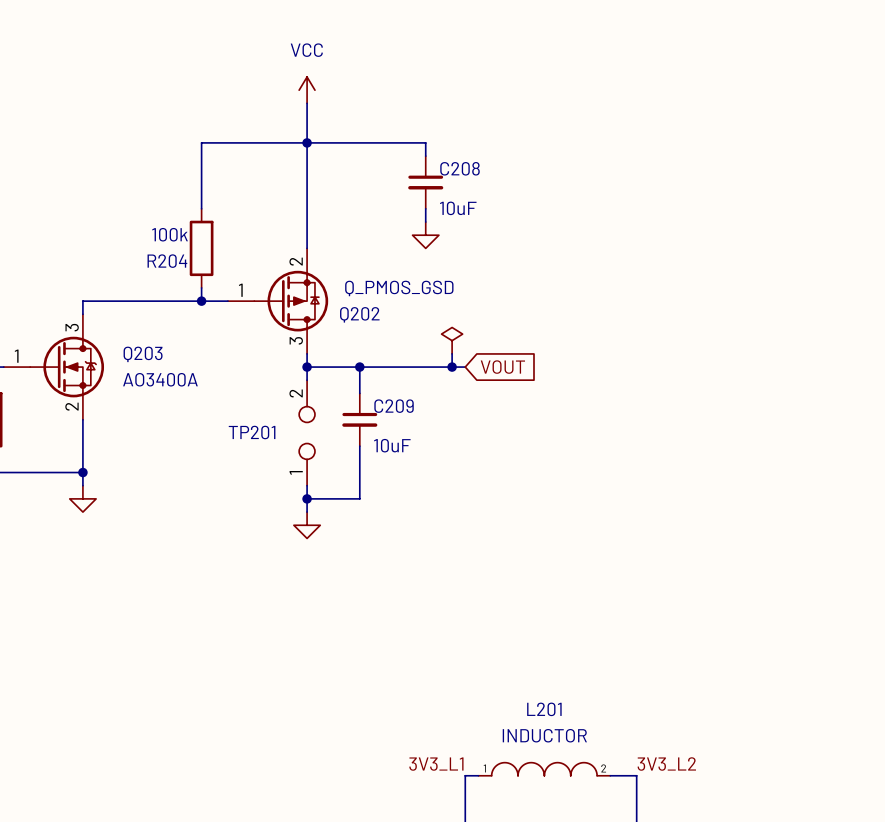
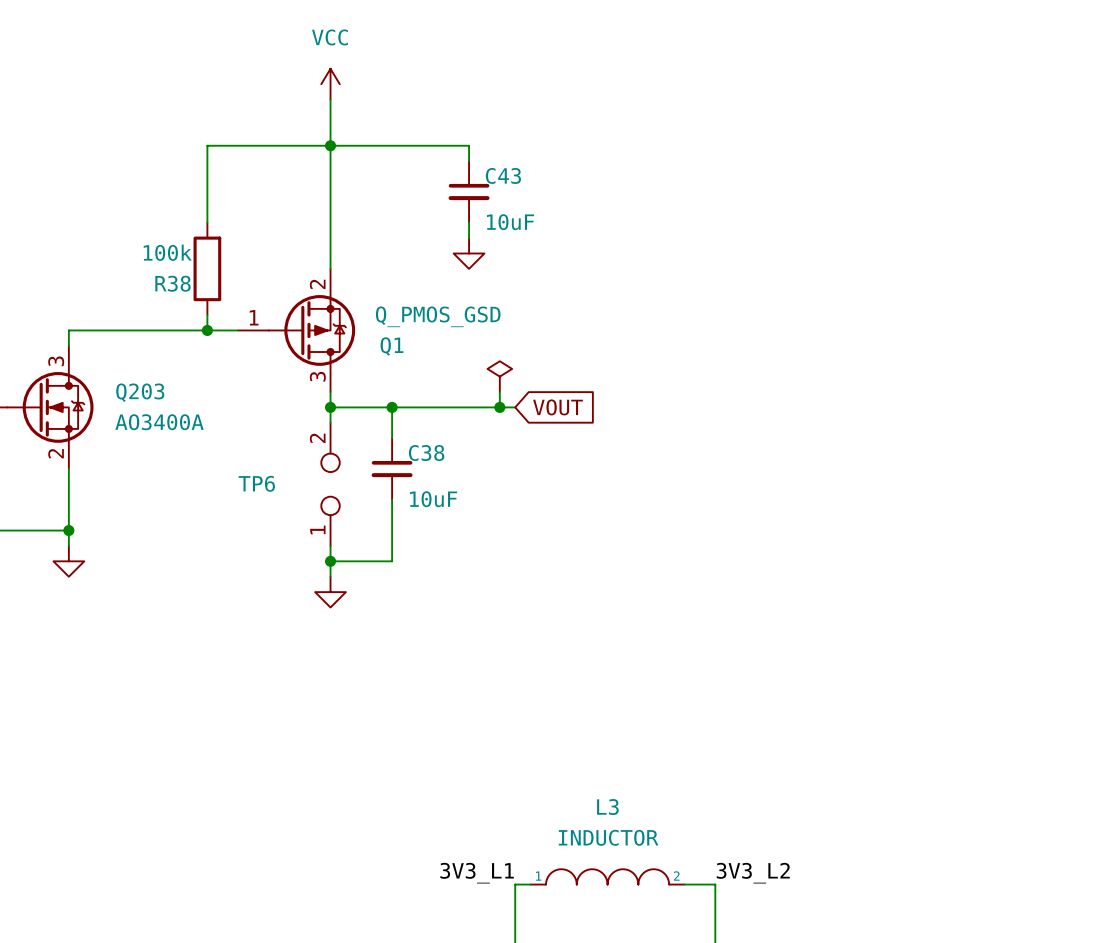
C208 name: C208 (460, 168) -> C43 (503, 175)
R204 name: R204 (167, 261) -> R38 (173, 283)
Q202: Q_PMOS_GSD (278, 301) -> none
Q1: none -> Q_PMOS_GSD (296, 330)
C209 name: C209 (394, 406) -> C38 (426, 453)
TP201 name: TP201 (252, 432) -> TP6 (256, 483)
L201 name: L201 (544, 709) -> L3 (607, 807)

